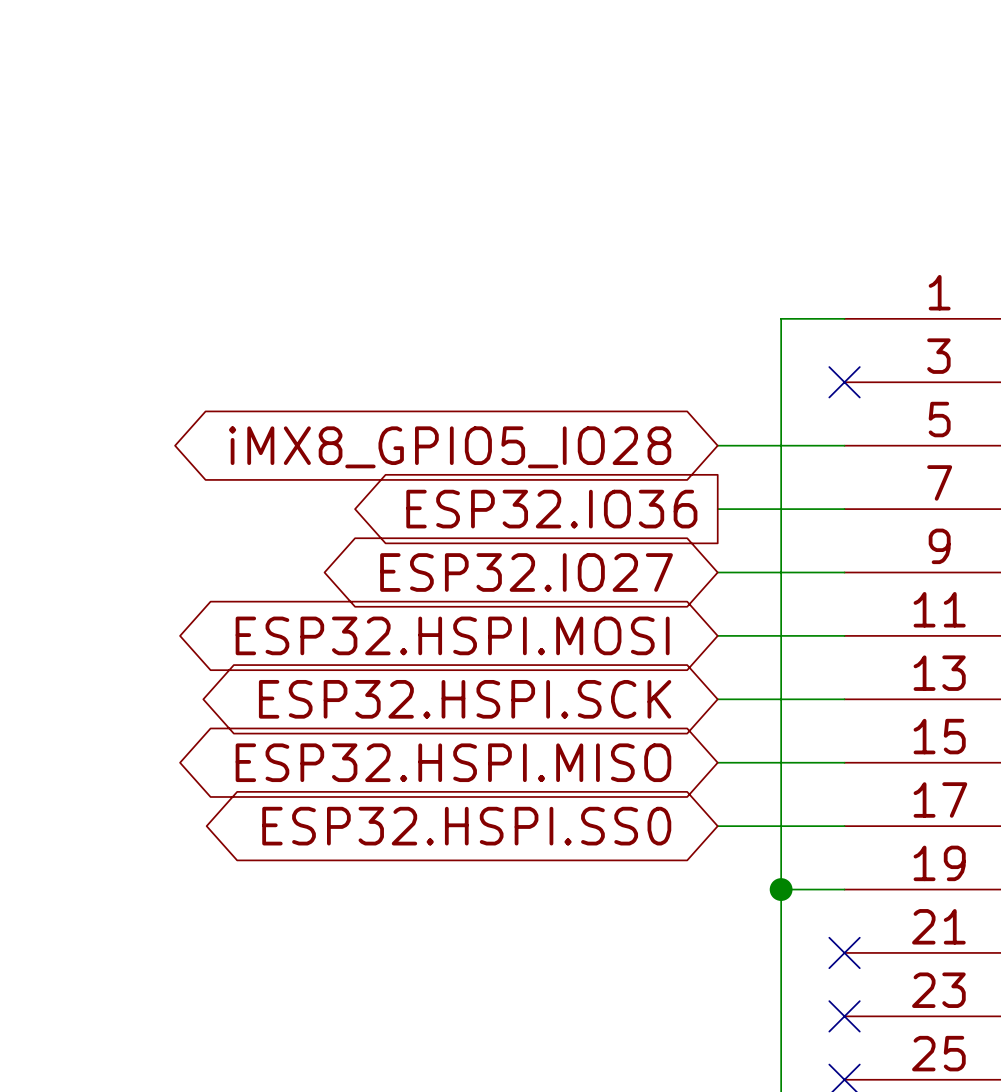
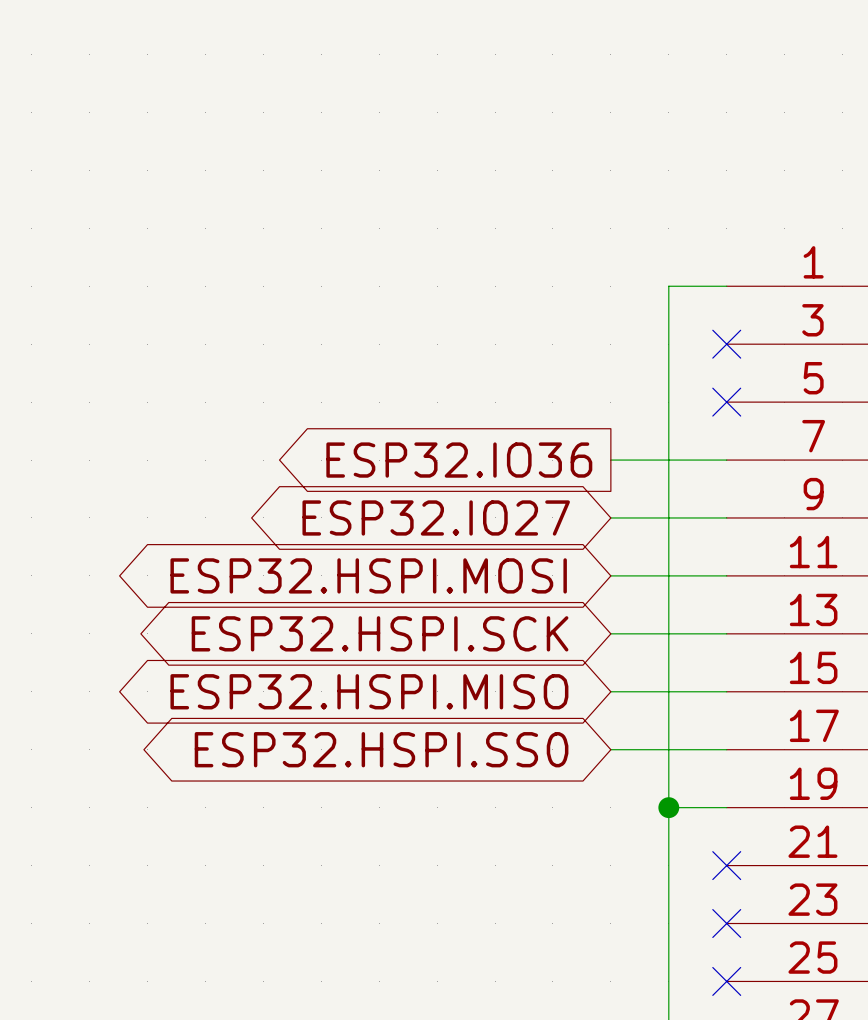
wire: (717, 445) (844, 445) -> none
no-connect mark: none -> (726, 402)
global label: iMX8_GPIO5_IO28 (450, 447) -> none

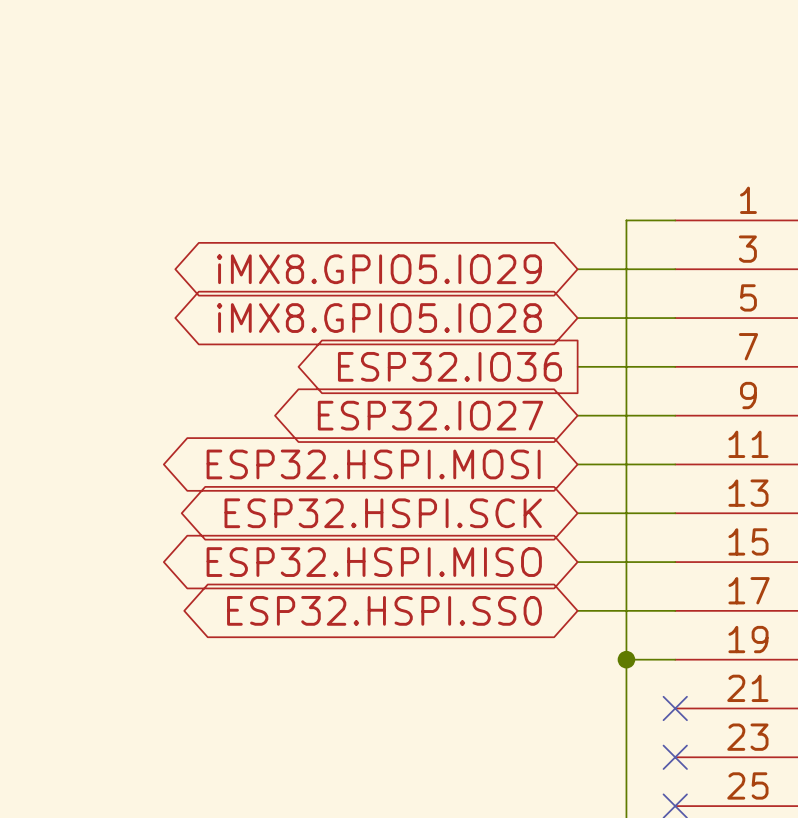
global label: none -> iMX8.GPIO5.IO29 (379, 269)
wire: none -> (577, 269) (675, 269)
no-connect mark: (726, 344) -> none
global label: none -> iMX8.GPIO5.IO28 (379, 318)
wire: none -> (577, 318) (675, 318)
no-connect mark: (726, 402) -> none

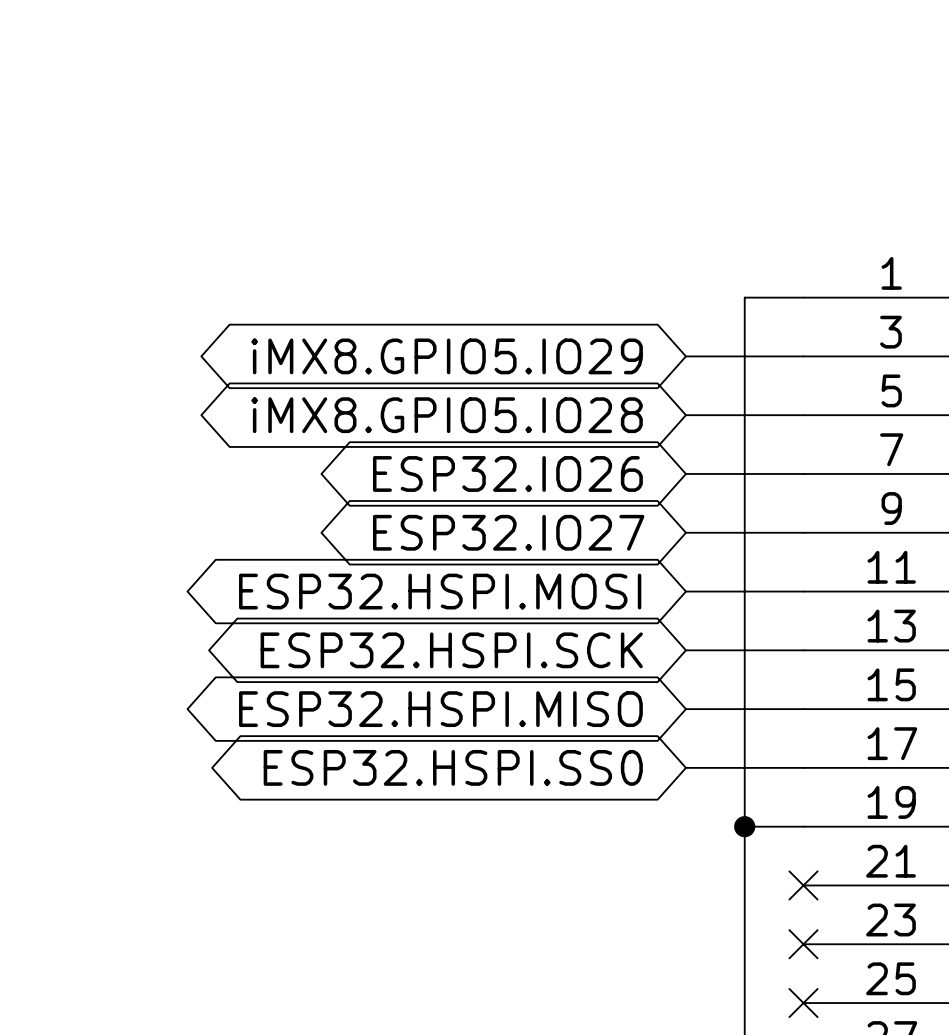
global label shape: output (449, 366) -> bidirectional (507, 473)
global label: ESP32.IO36 (449, 366) -> ESP32.IO26 (507, 473)

